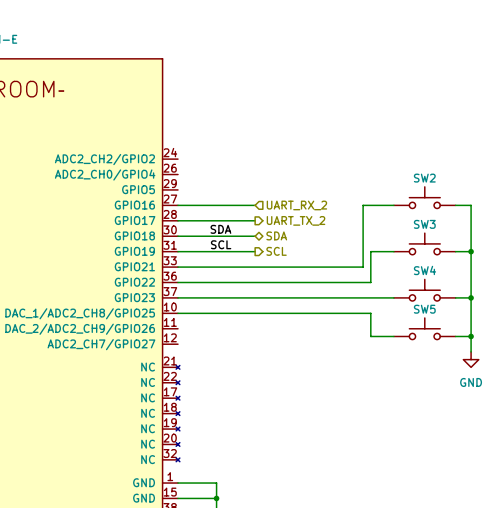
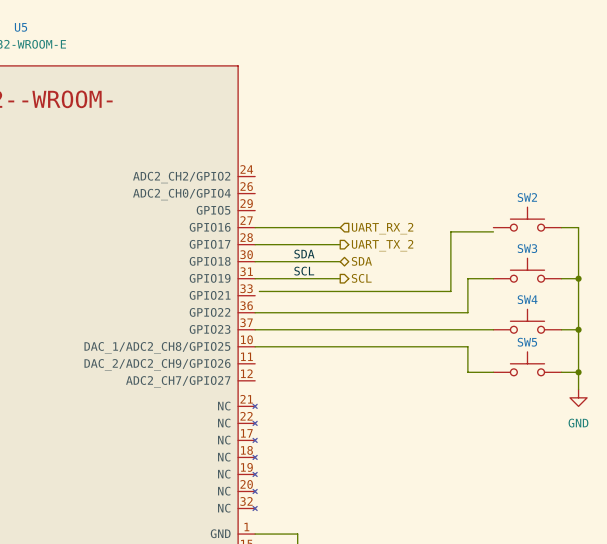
wire: (393, 205) (363, 205) (363, 267) (178, 267) -> none
wire: none -> (493, 231) (450, 231) (450, 291) (259, 291)

